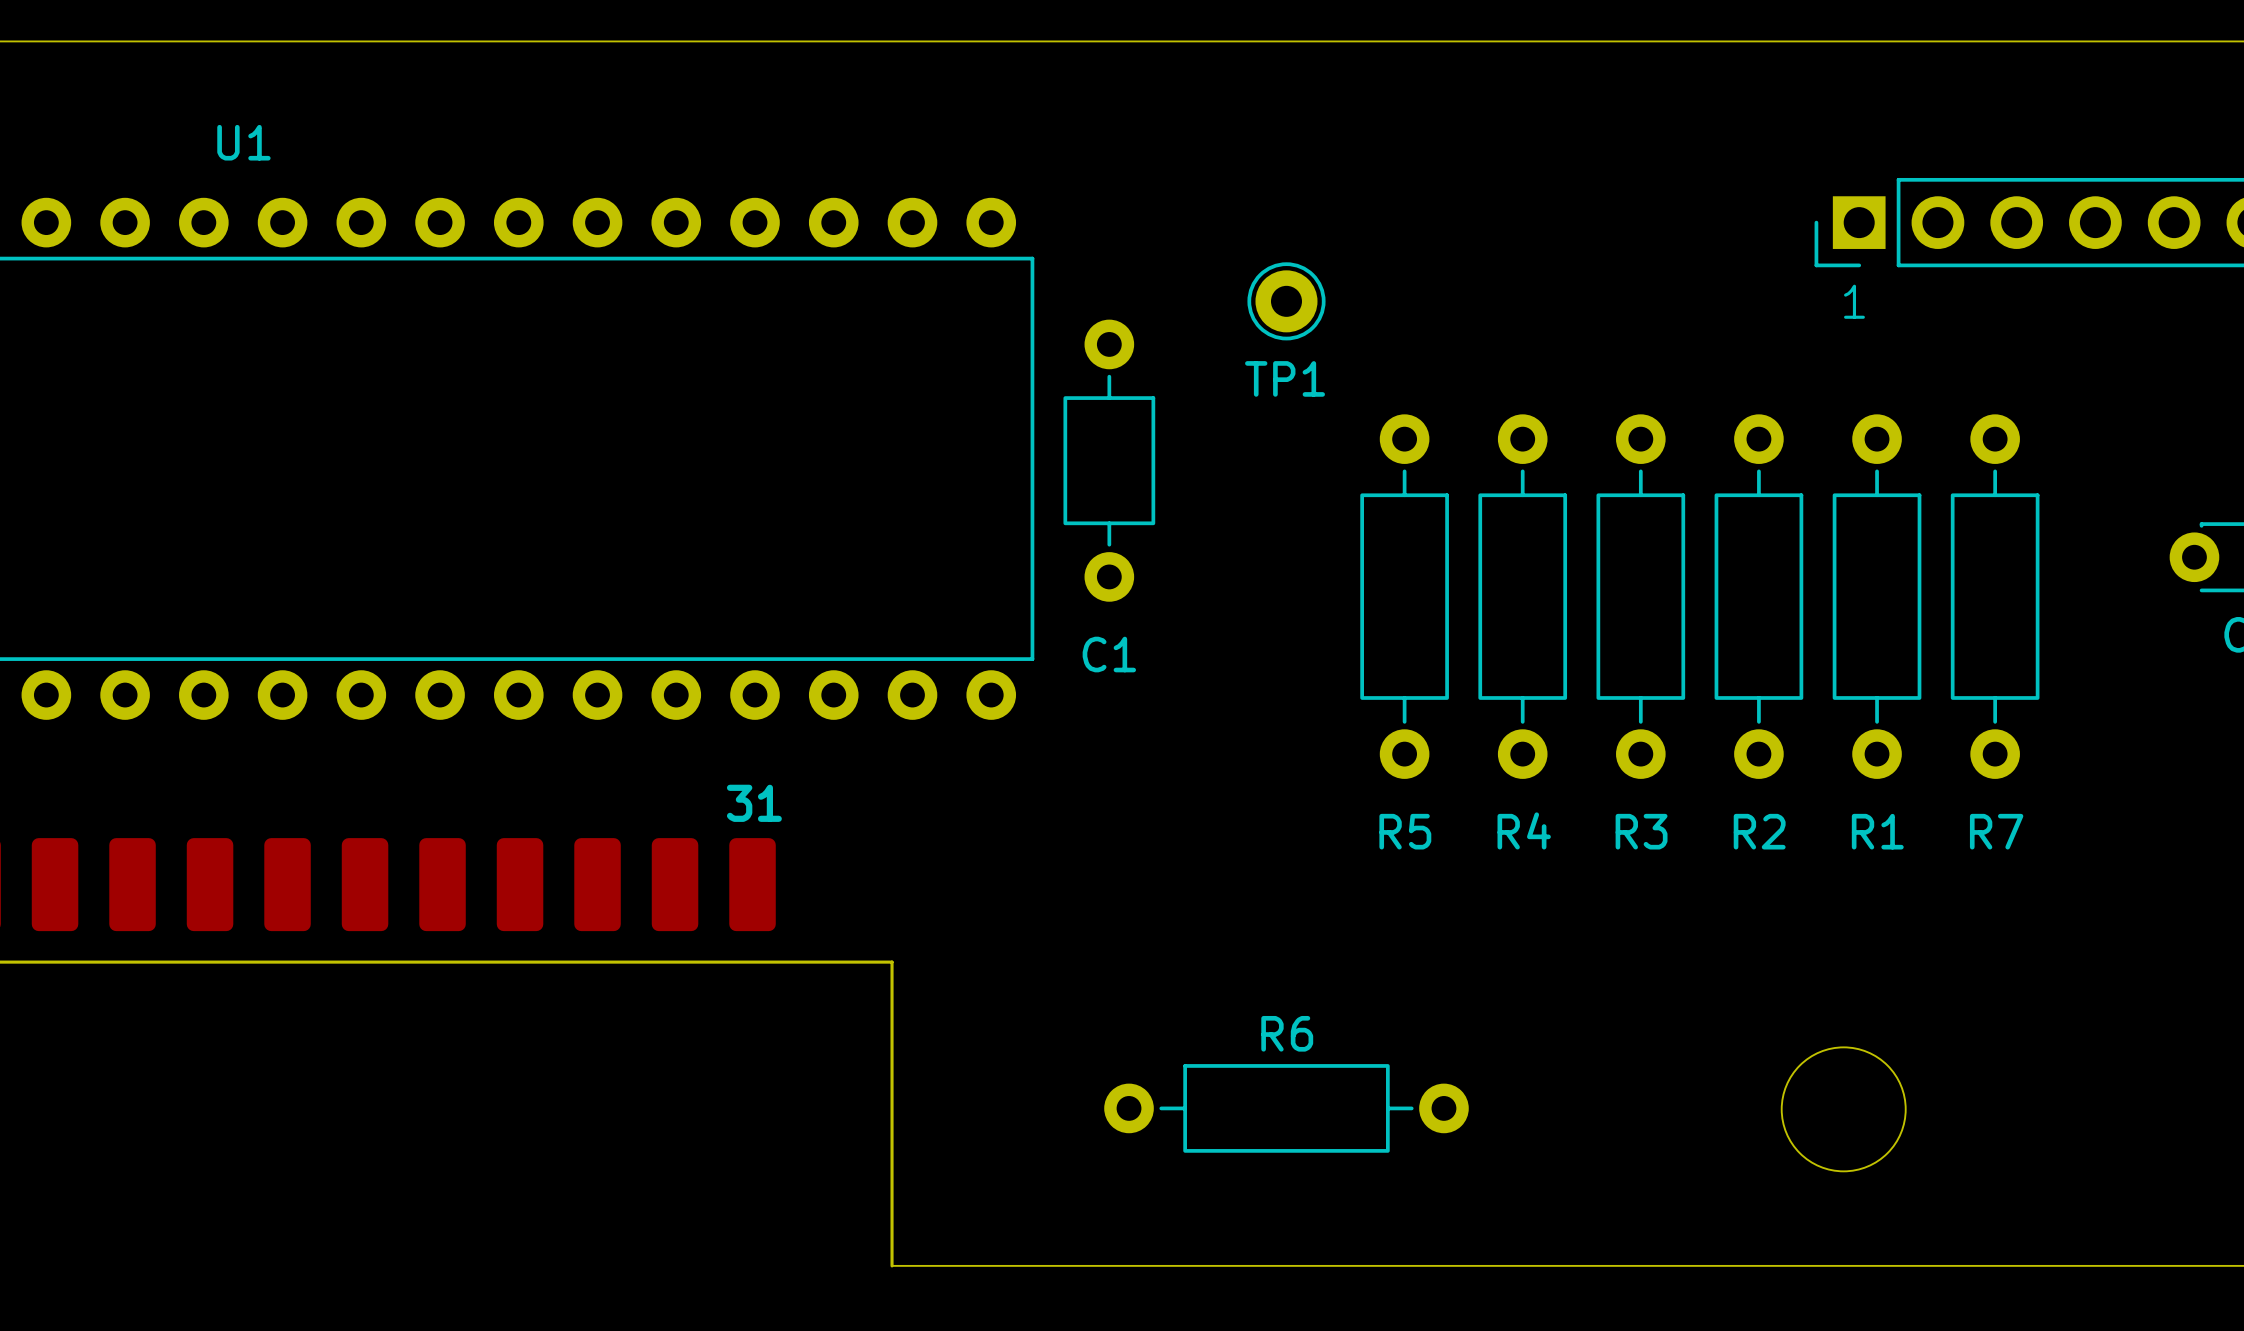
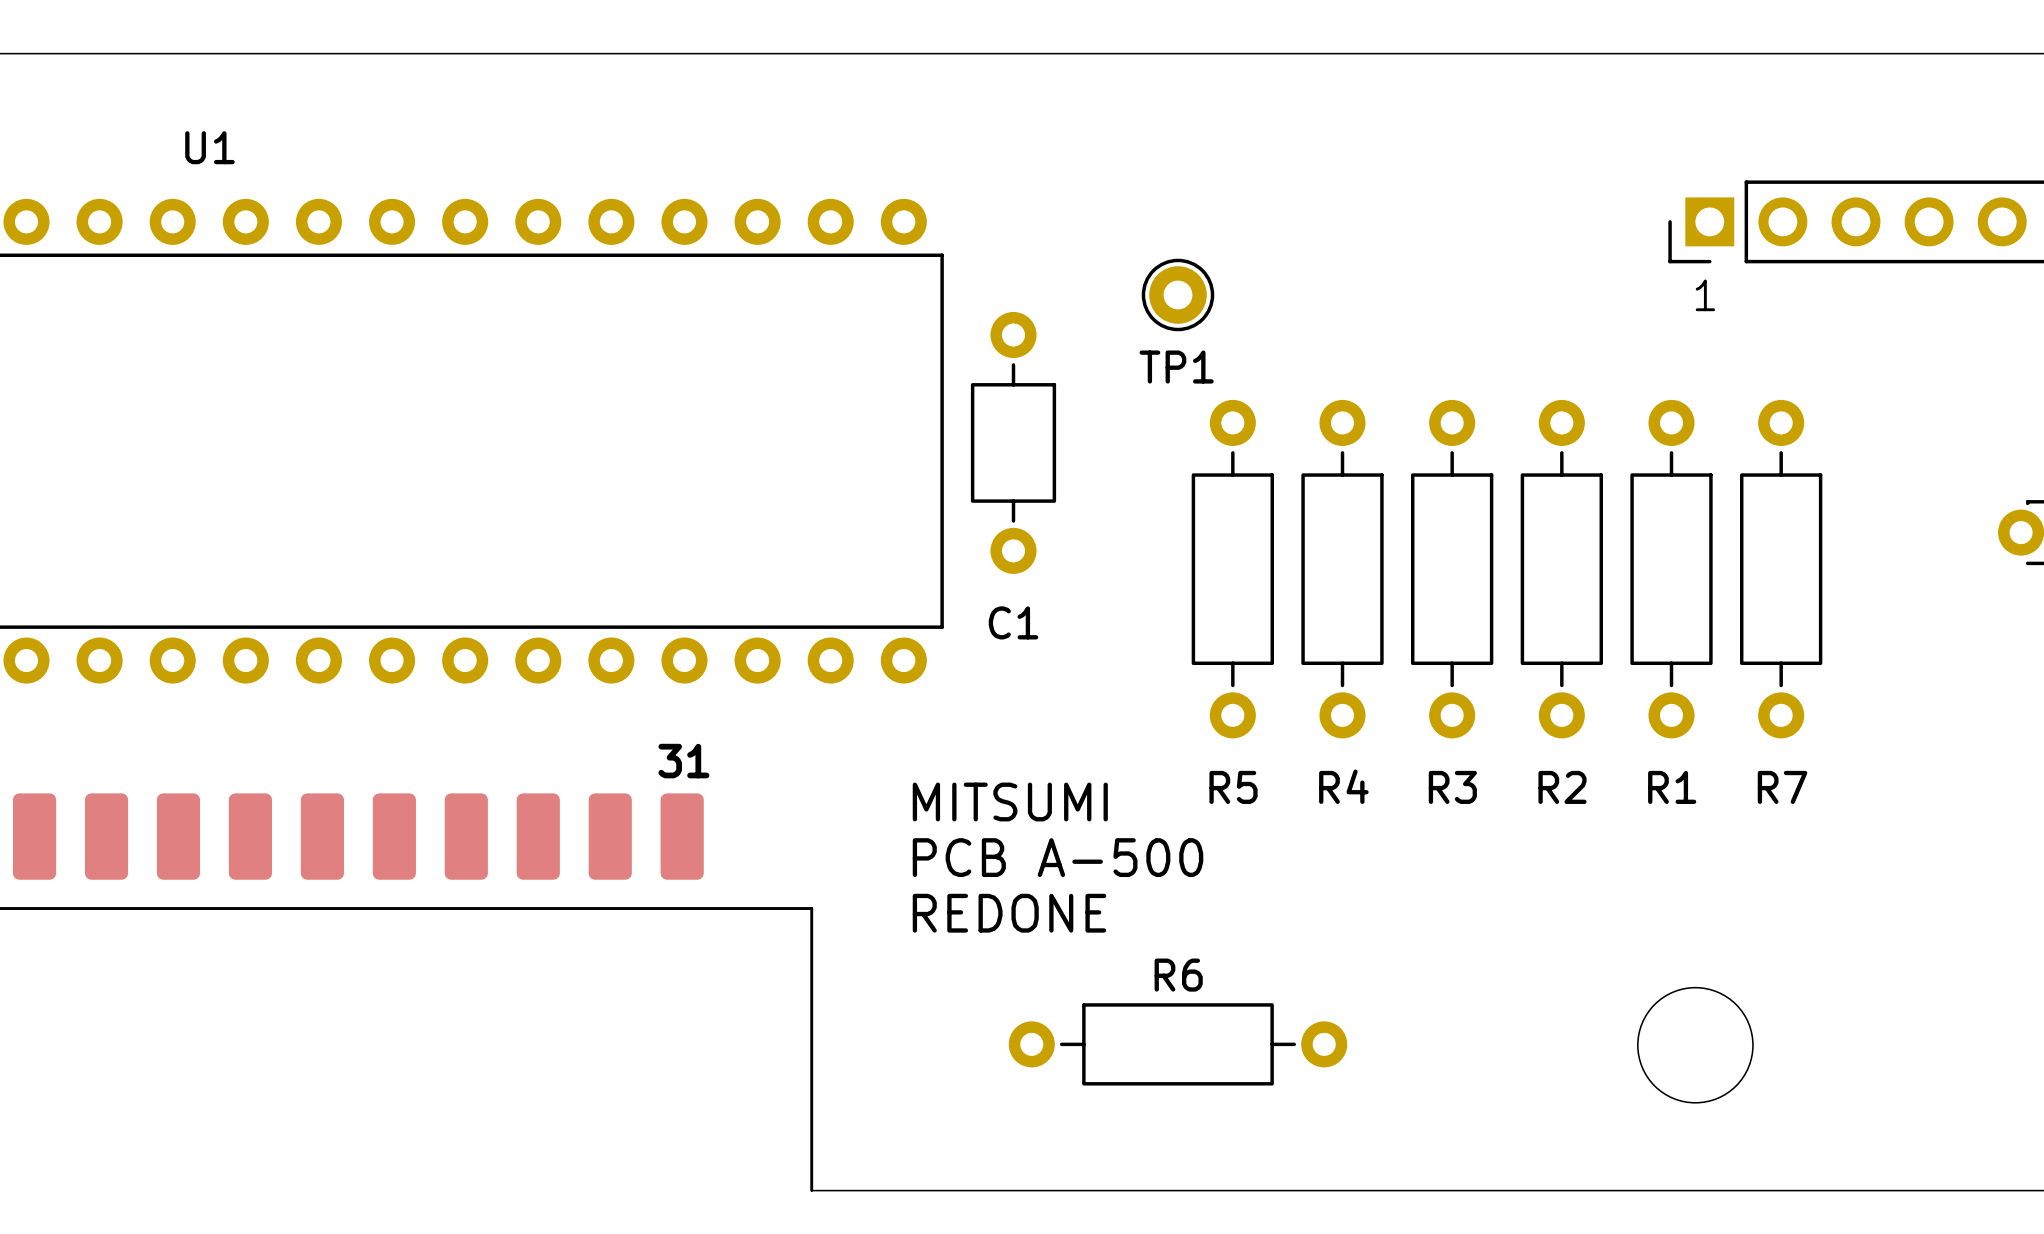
R5 position: (1404, 596) -> (1232, 569)
R4 position: (1522, 596) -> (1342, 569)
R3 position: (1640, 596) -> (1452, 569)
R2 position: (1758, 596) -> (1561, 569)
R1 position: (1877, 596) -> (1671, 569)
R7 position: (1995, 596) -> (1781, 569)
text: none -> MITSUMI (1010, 801)
text: none -> PCB A-500 (1057, 857)
text: none -> REDONE (1009, 913)

